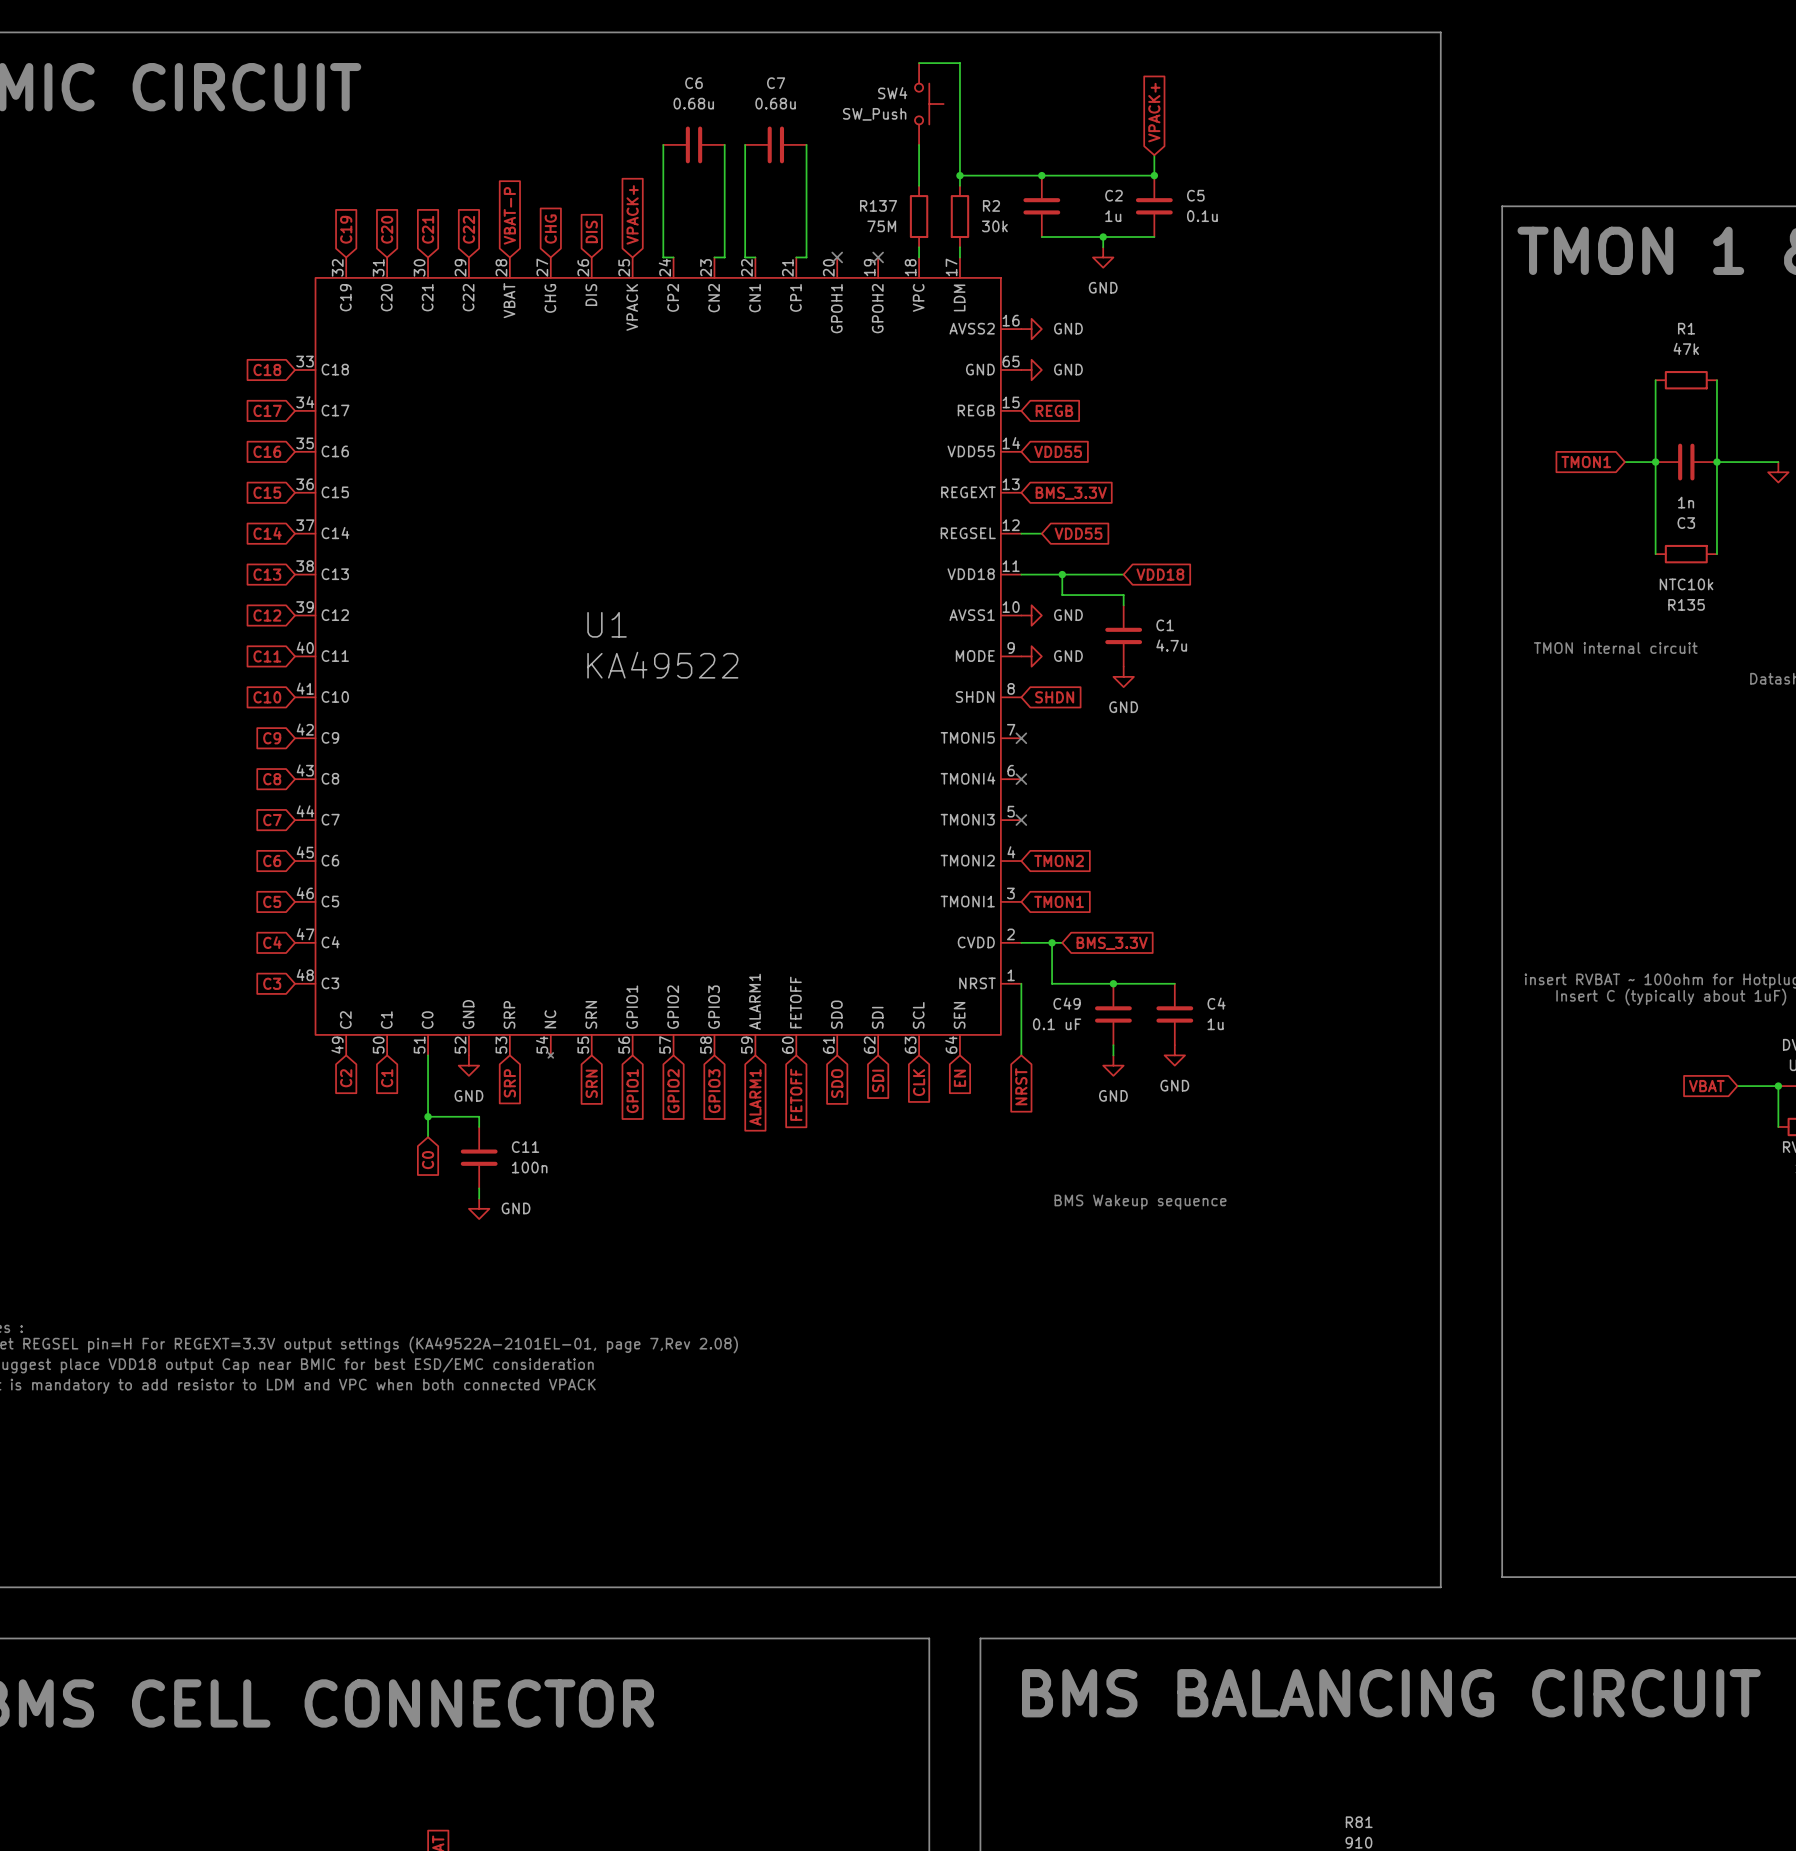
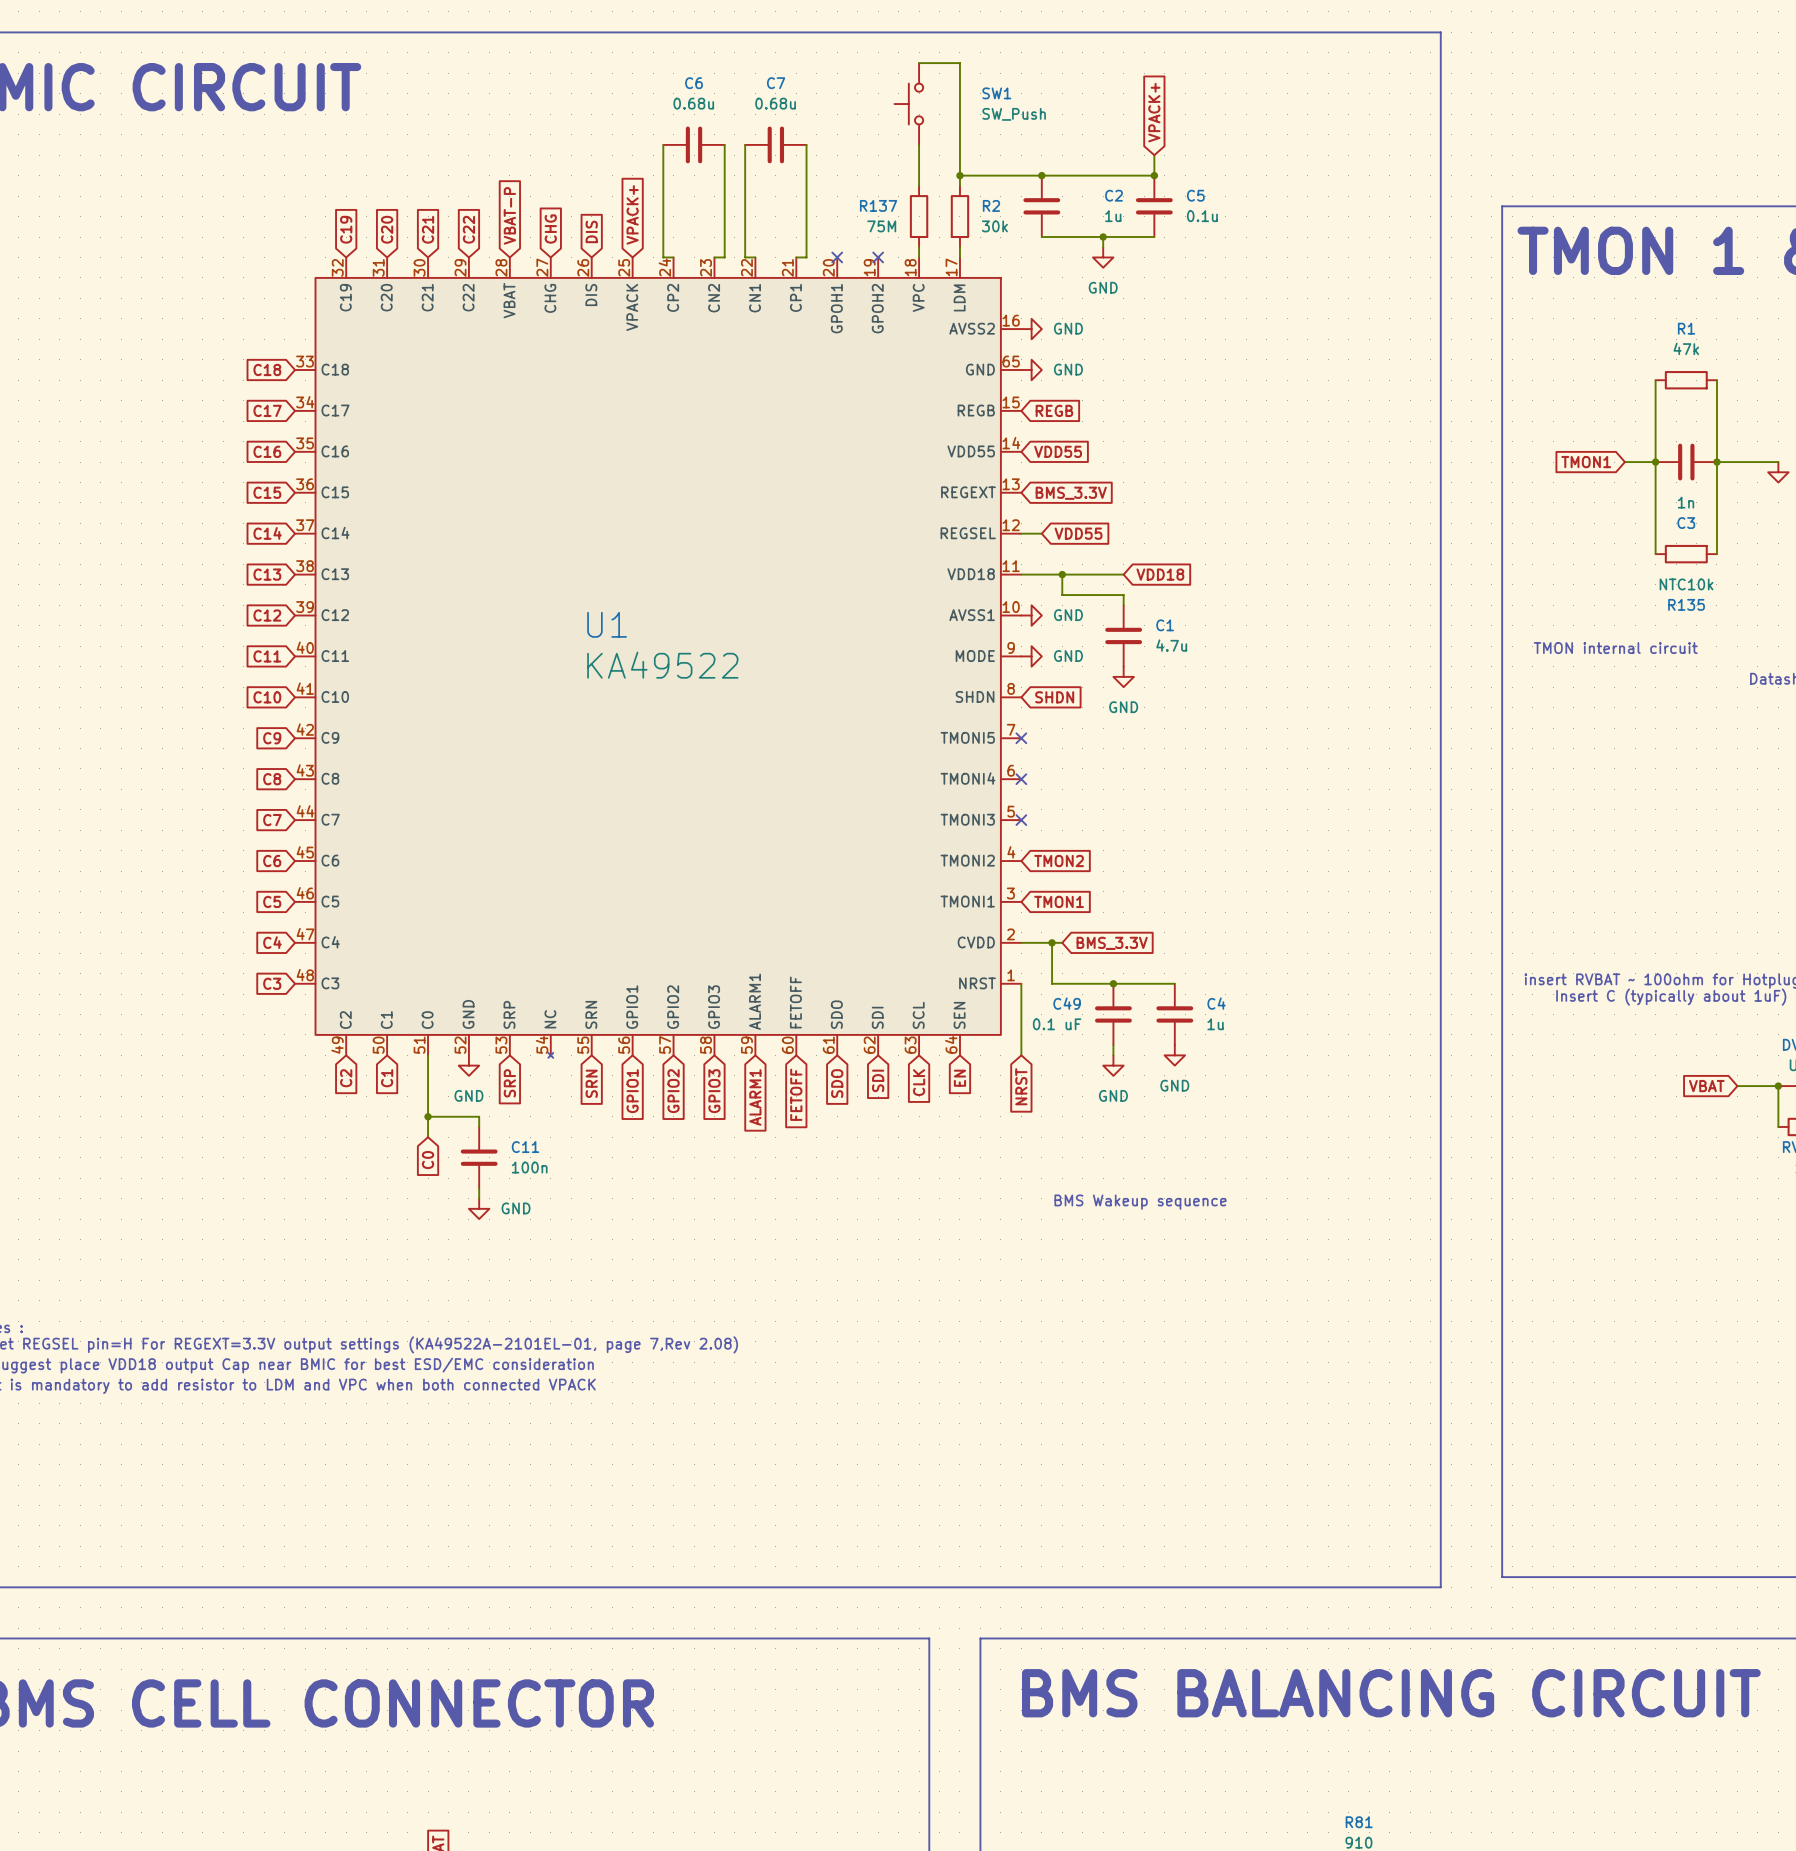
SW1: none -> SW_Push (908, 104)
SW4: SW_Push (929, 104) -> none

